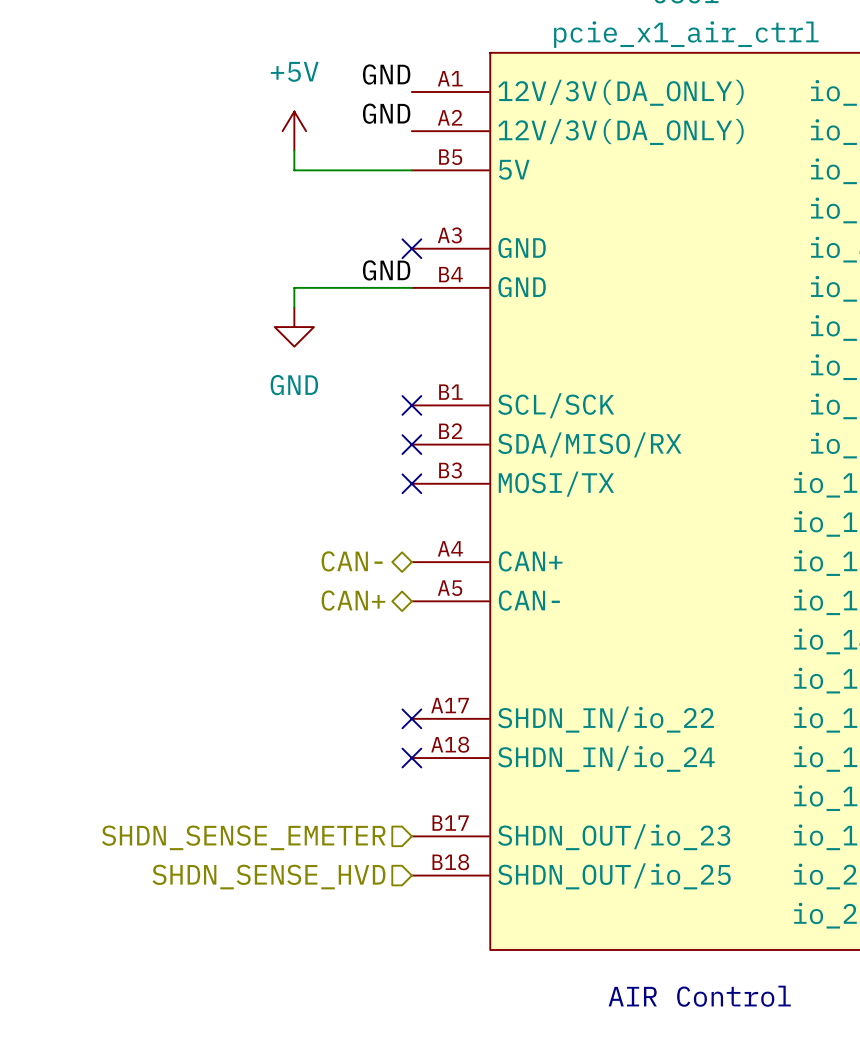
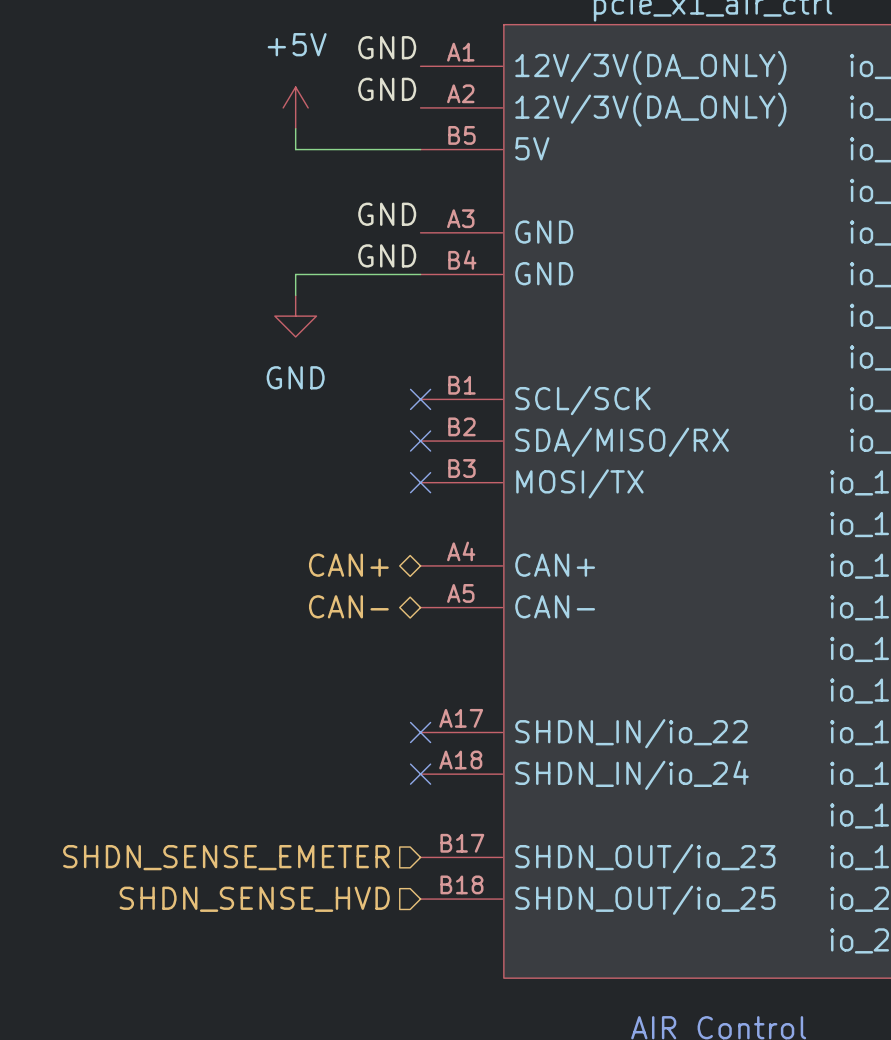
label: none -> GND (387, 214)
no-connect mark: (411, 248) -> none
hierarchical label: CAN- (352, 561) -> CAN+ (348, 565)
hierarchical label: CAN+ (353, 600) -> CAN- (348, 606)

